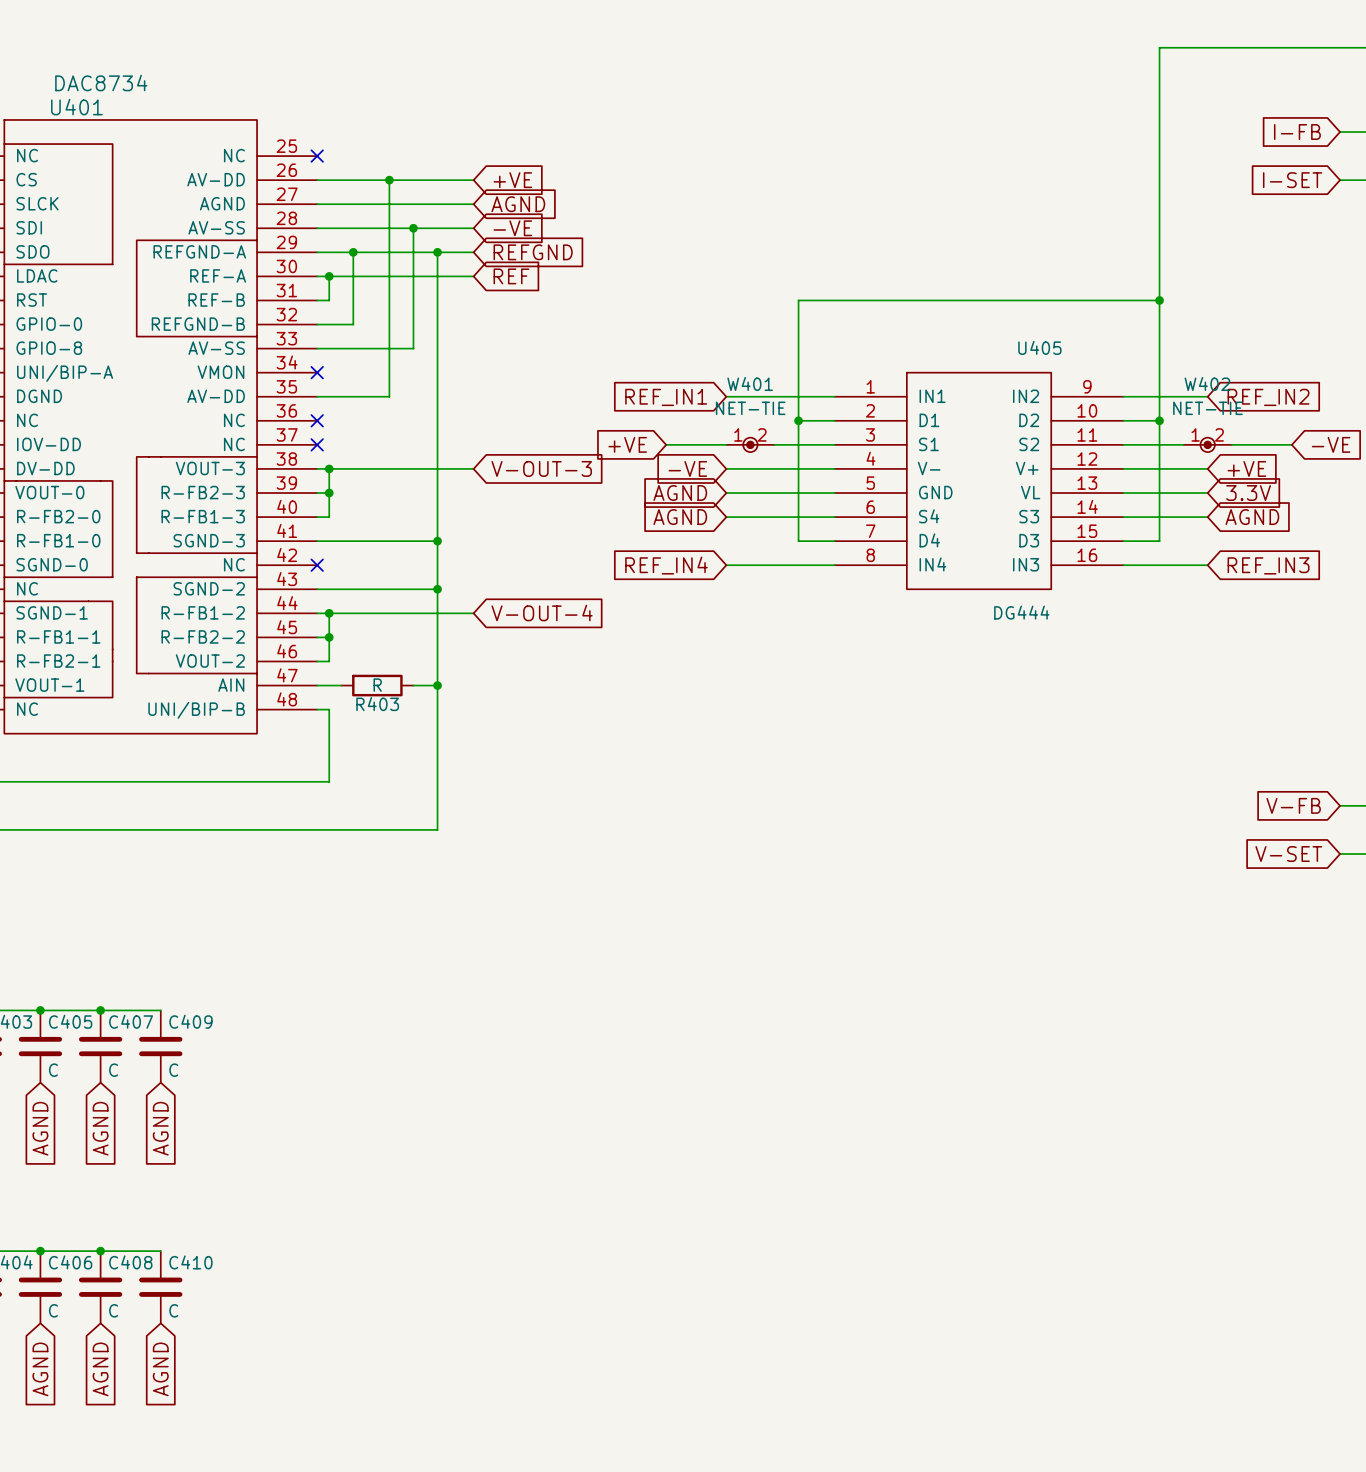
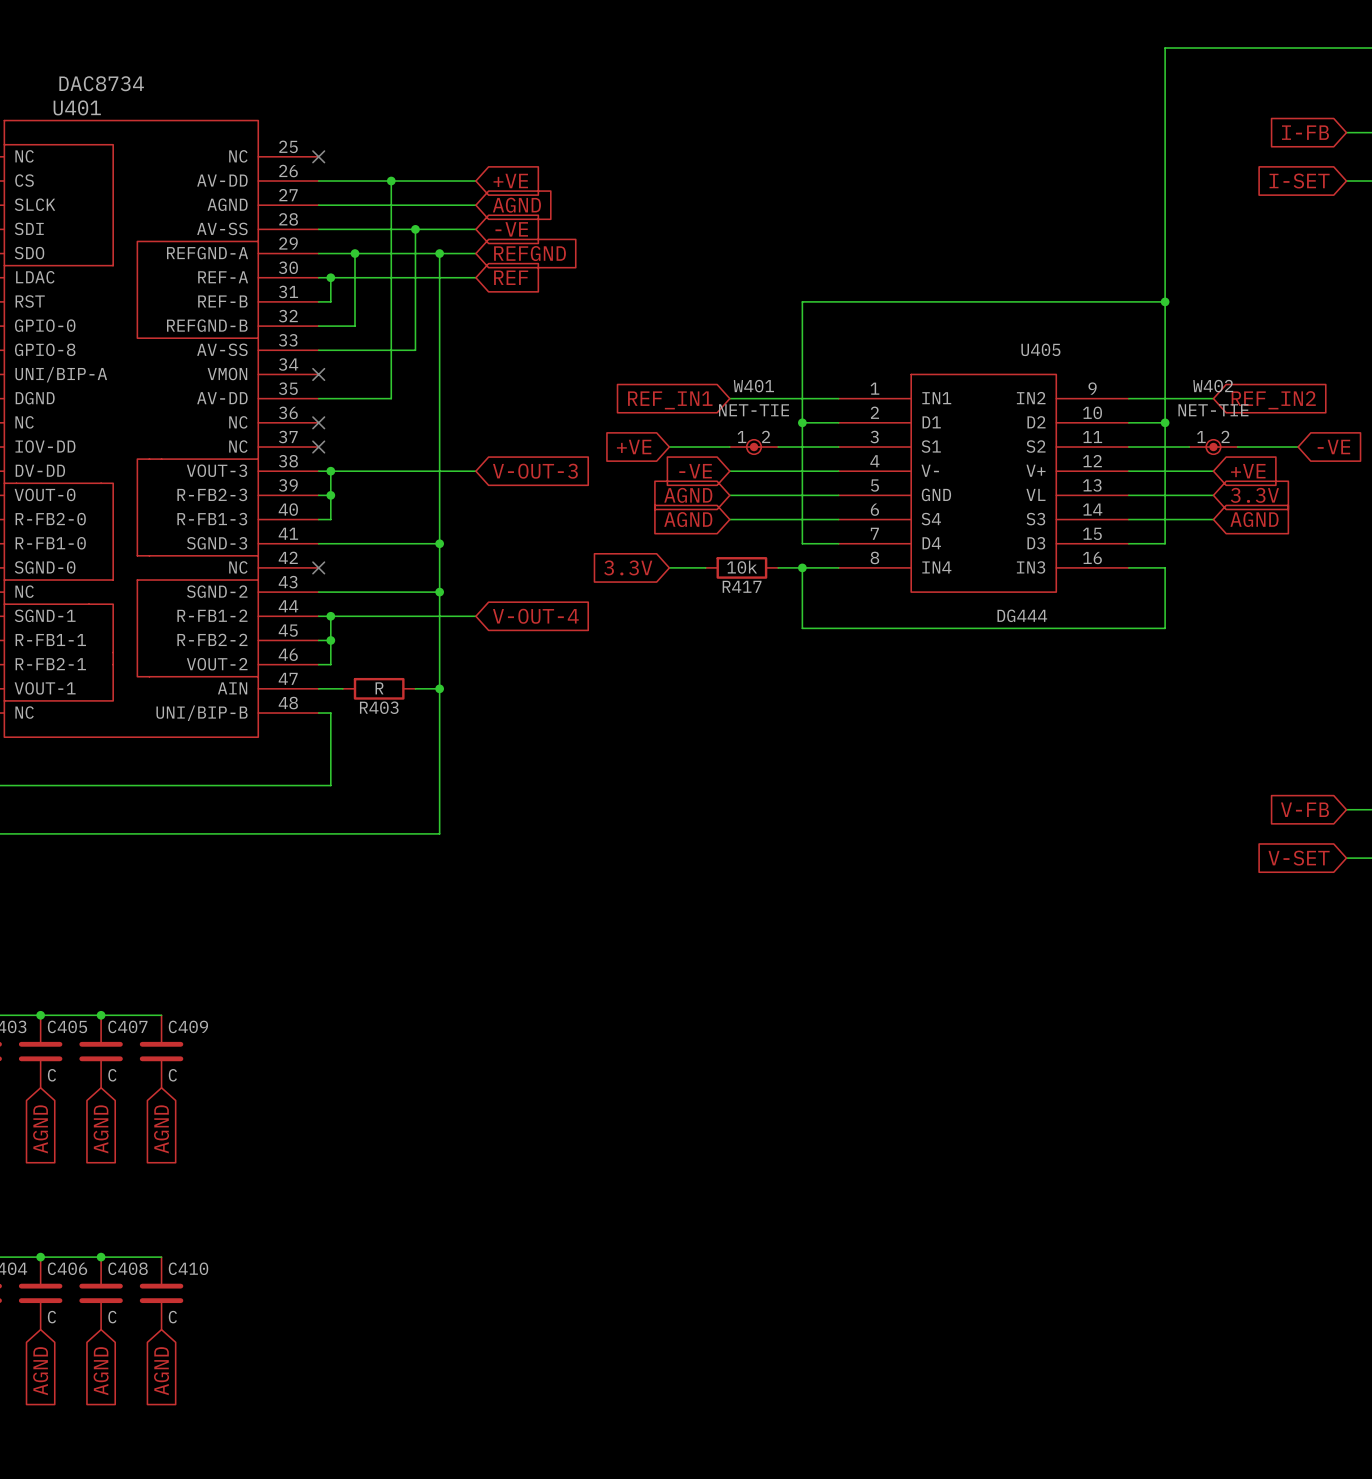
global label: none -> 3.3V (628, 567)
wire: none -> (669, 567) (705, 567)
global label: REF_IN4 (666, 565) -> none
wire: (726, 565) (774, 565) -> none
R417: none -> 10k (741, 567)
junction: none -> (802, 567)
wire: (1159, 565) (1207, 565) -> (1165, 567) (1165, 628) (802, 628) (802, 567)
global label: REF_IN3 (1268, 565) -> none

